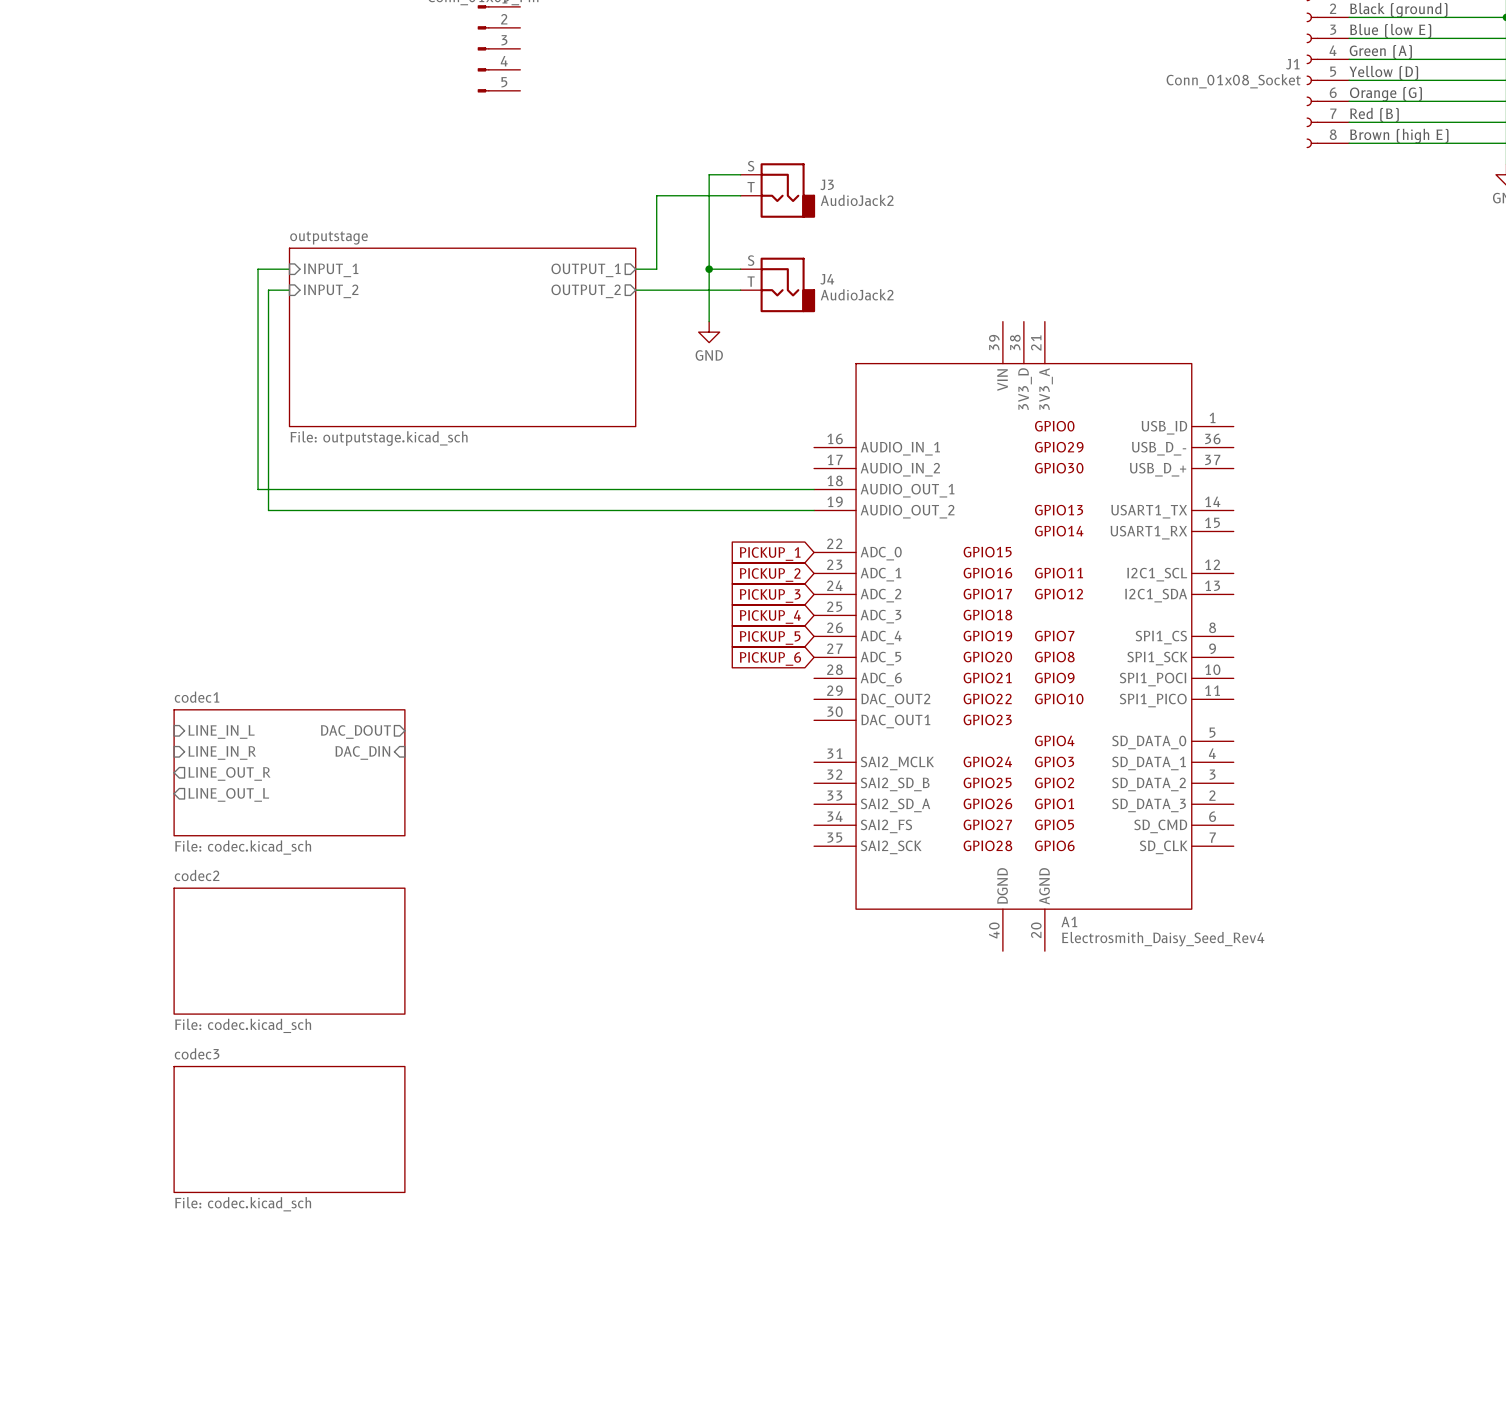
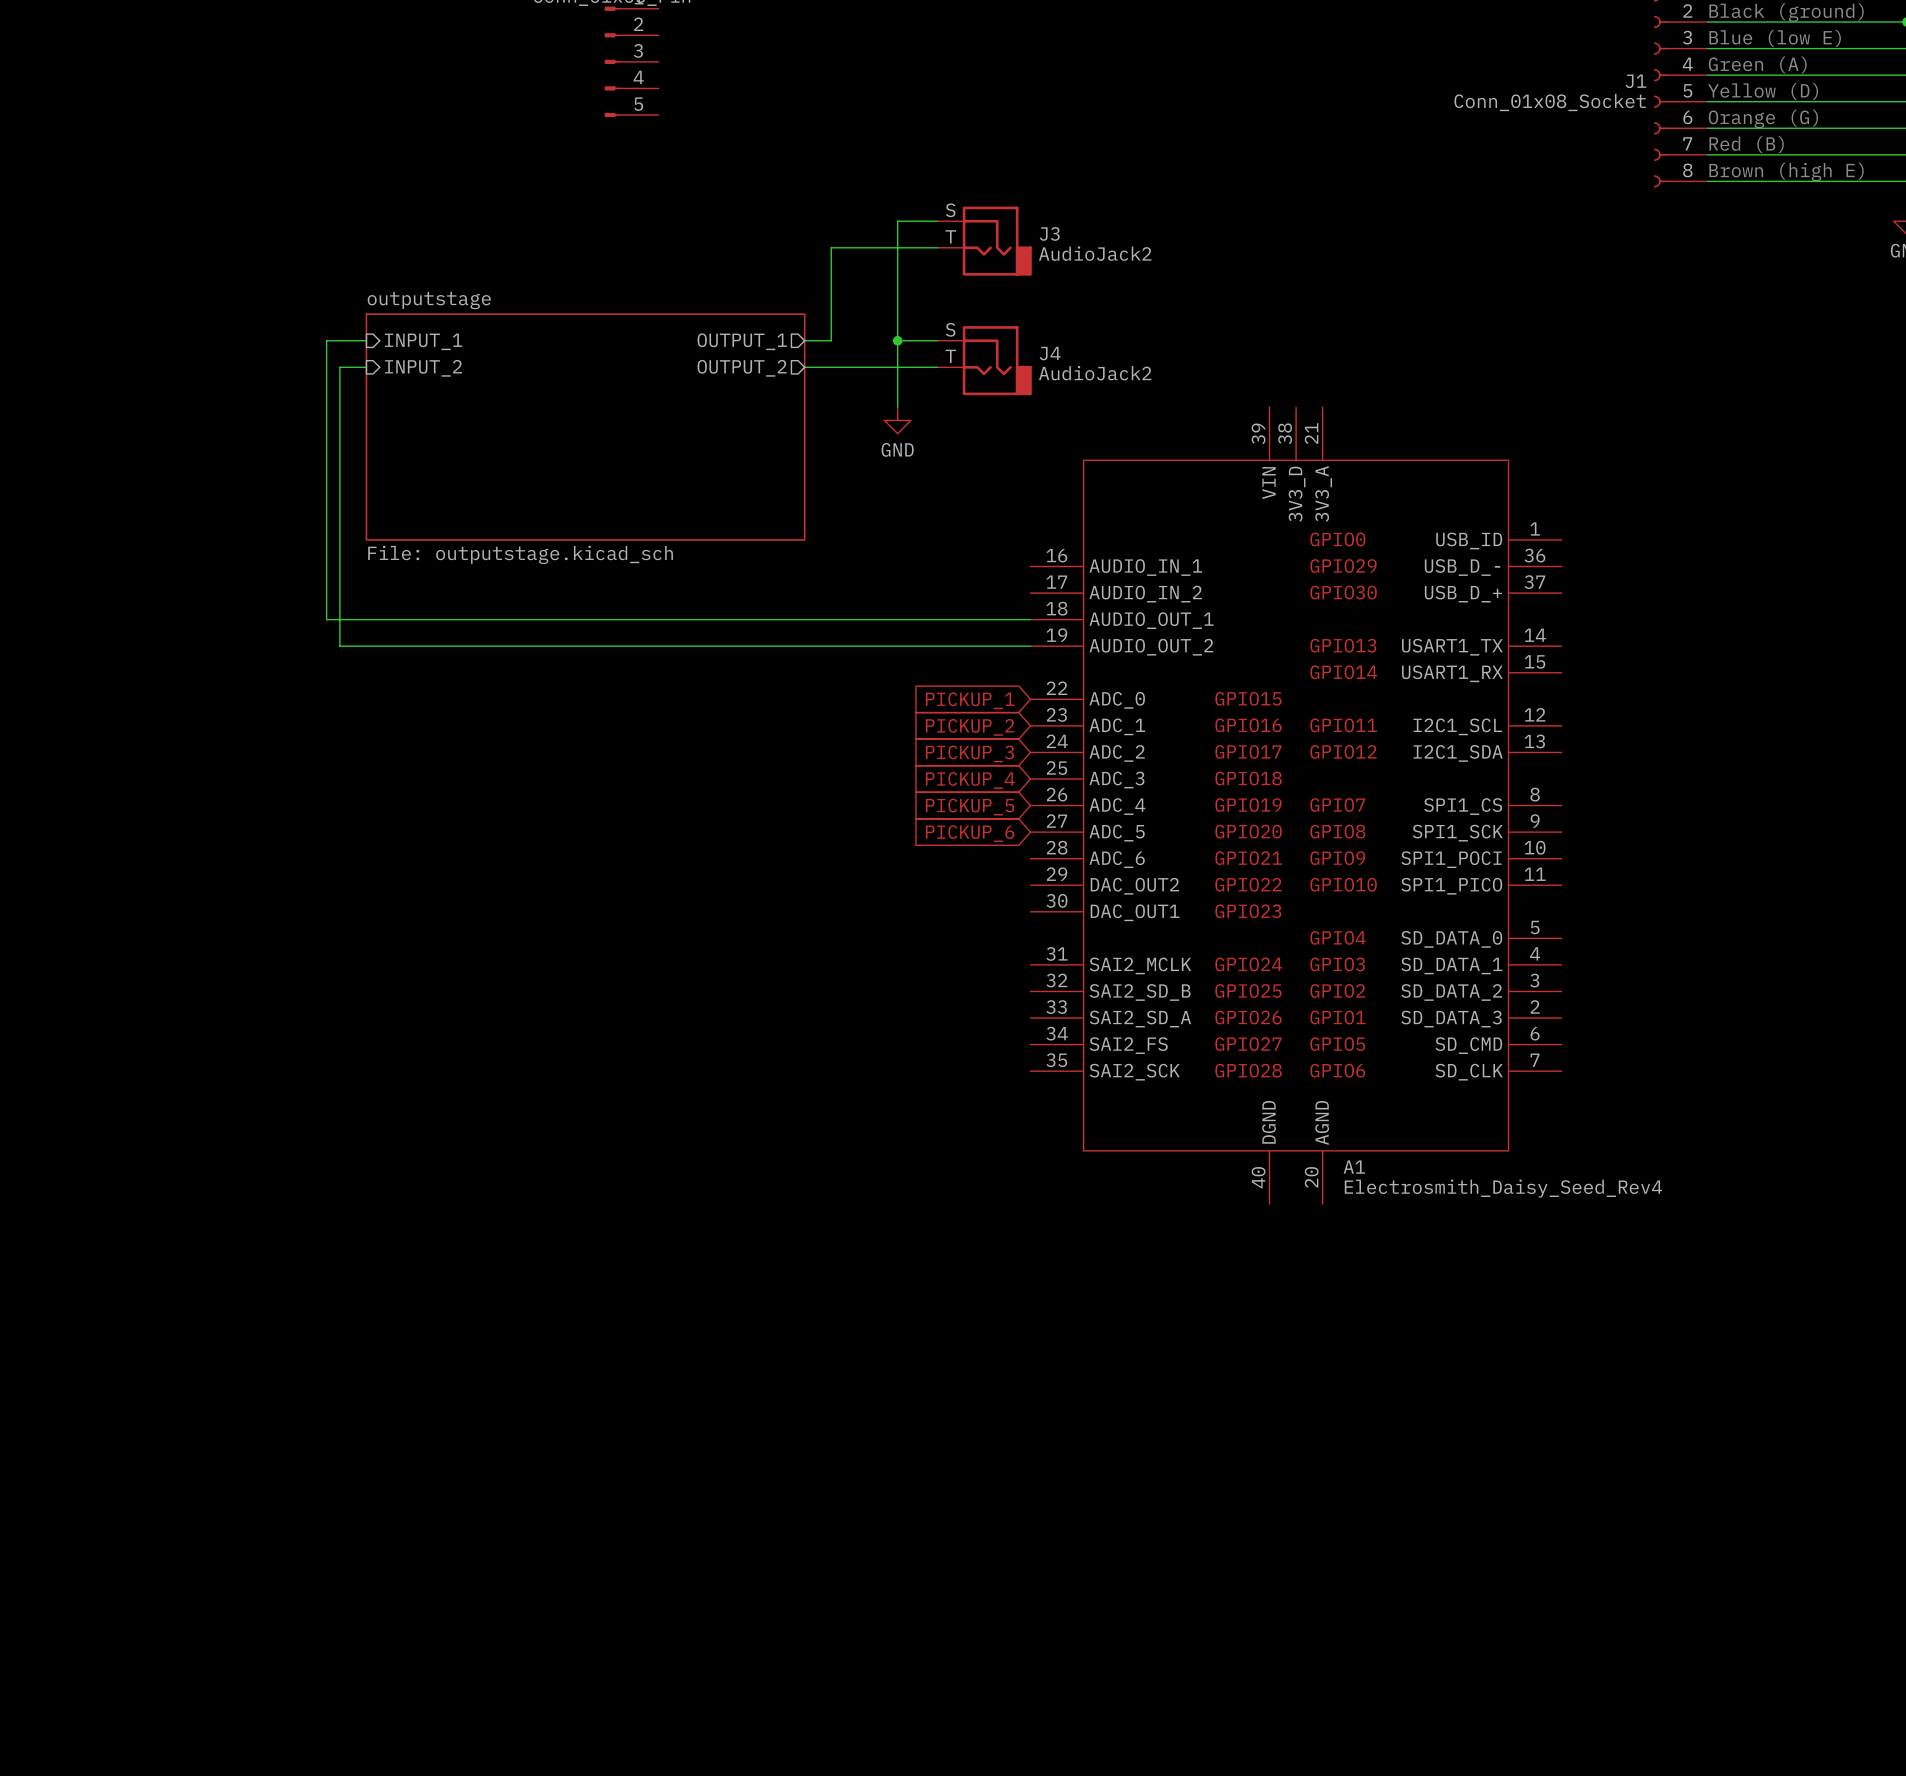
sheet pin: LINE_IN_L (221, 731) -> none
sheet pin: DAC_DOUT (355, 731) -> none
sheet pin: LINE_IN_R (222, 752) -> none
sheet pin: DAC_DIN (362, 752) -> none
sheet codec1: File: codec.kicad_sch (289, 772) -> none
sheet pin: LINE_OUT_R (229, 773) -> none
sheet pin: LINE_OUT_L (228, 794) -> none
sheet codec2: File: codec.kicad_sch (289, 951) -> none
sheet codec3: File: codec.kicad_sch (289, 1129) -> none

